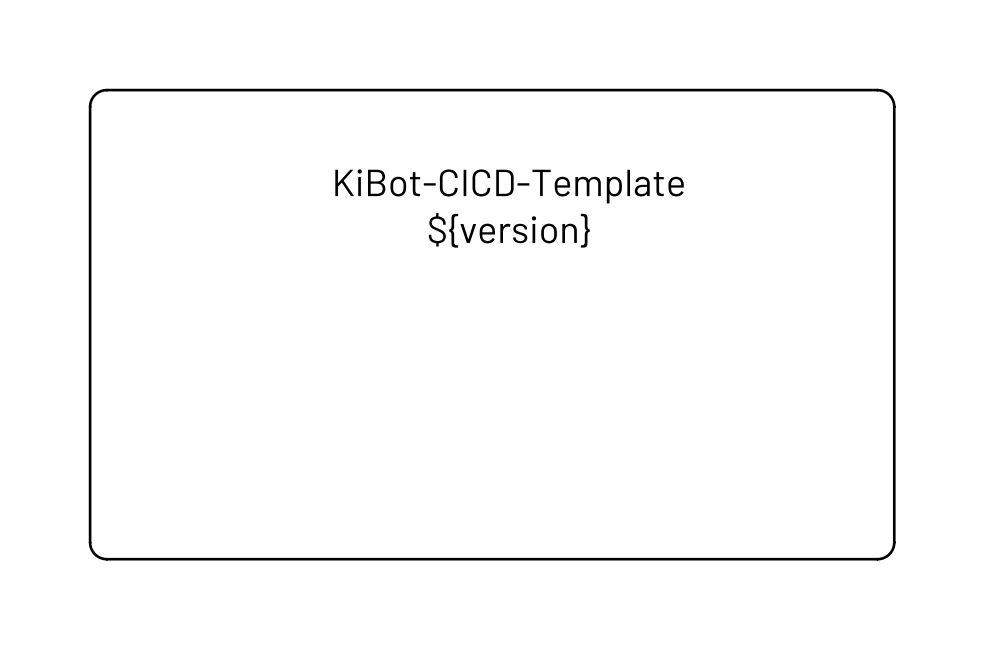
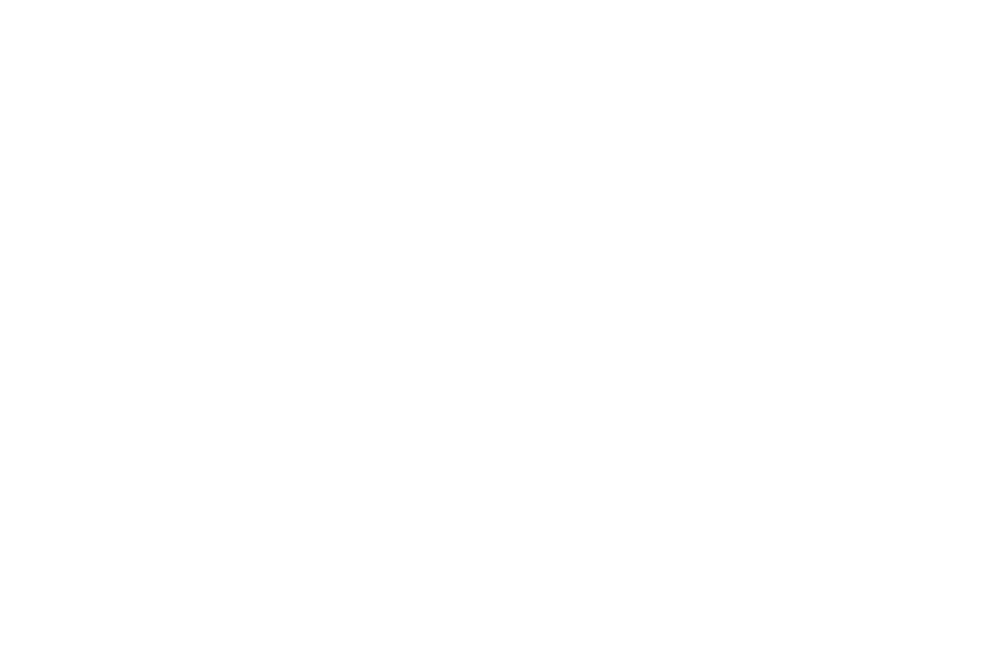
board edge: (106, 90) (877, 90) (886, 92) (891, 97) (894, 106) (894, 542) (891, 551) (884, 557) (877, 559) (106, 559) (97, 556) (91, 549) (90, 542) (90, 106) (95, 95) (106, 90) -> none
text: KiBot-CICD-Template (509, 186) -> none
text: ${version} (509, 230) -> none

